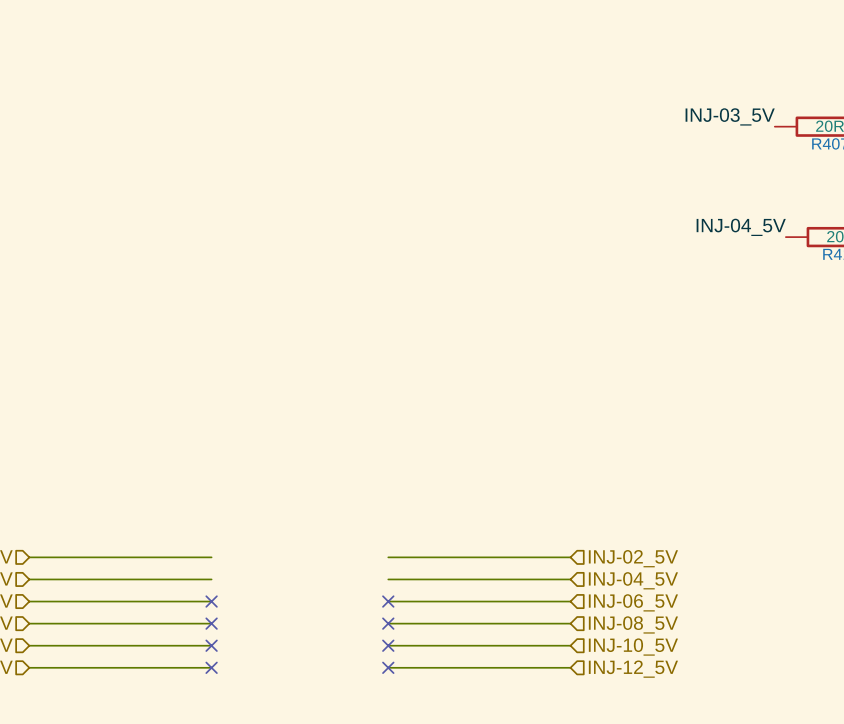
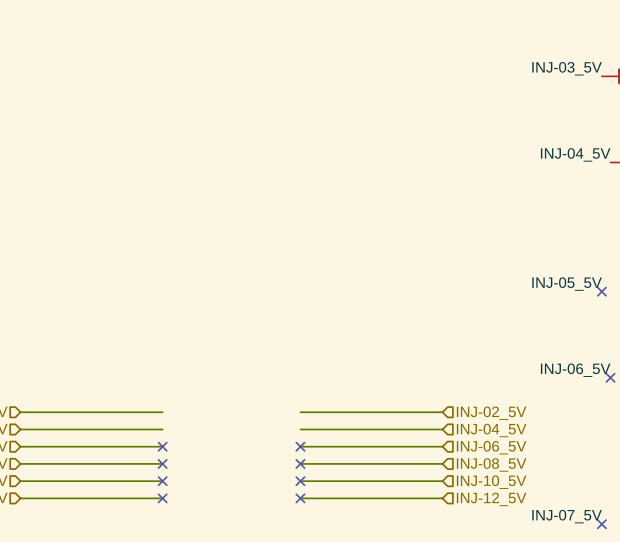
label: none -> INJ-05_5V (567, 284)
no-connect mark: none -> (601, 291)
label: none -> INJ-06_5V (575, 370)
no-connect mark: none -> (610, 377)
label: none -> INJ-07_5V (567, 516)
no-connect mark: none -> (601, 524)

